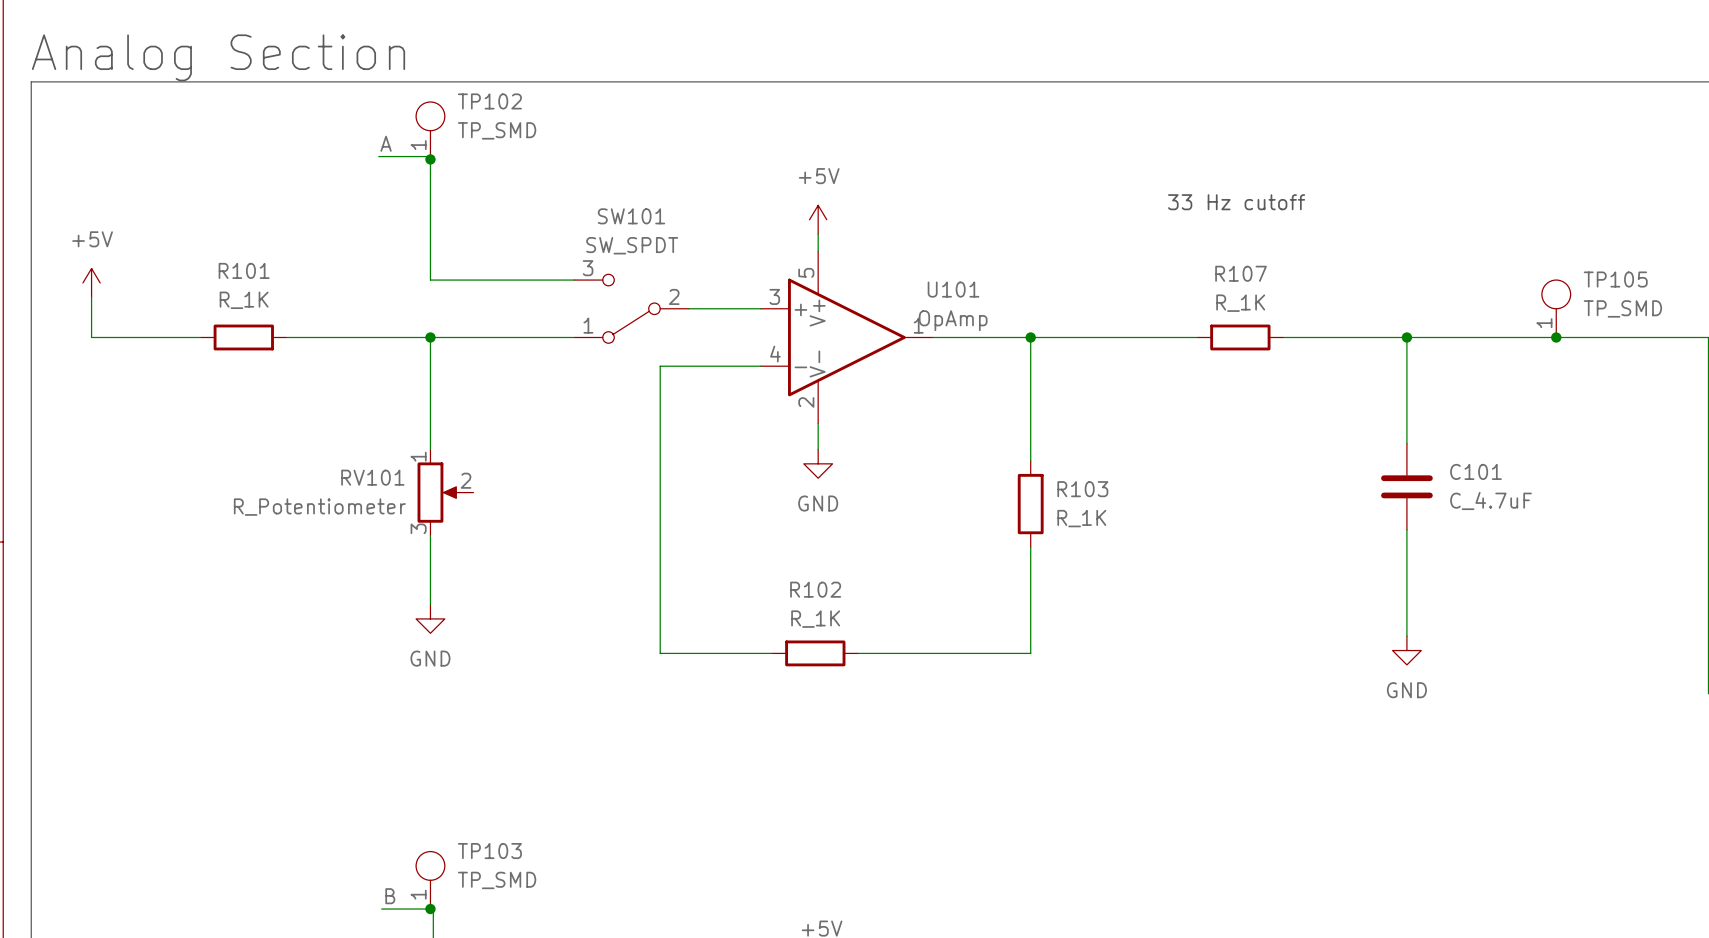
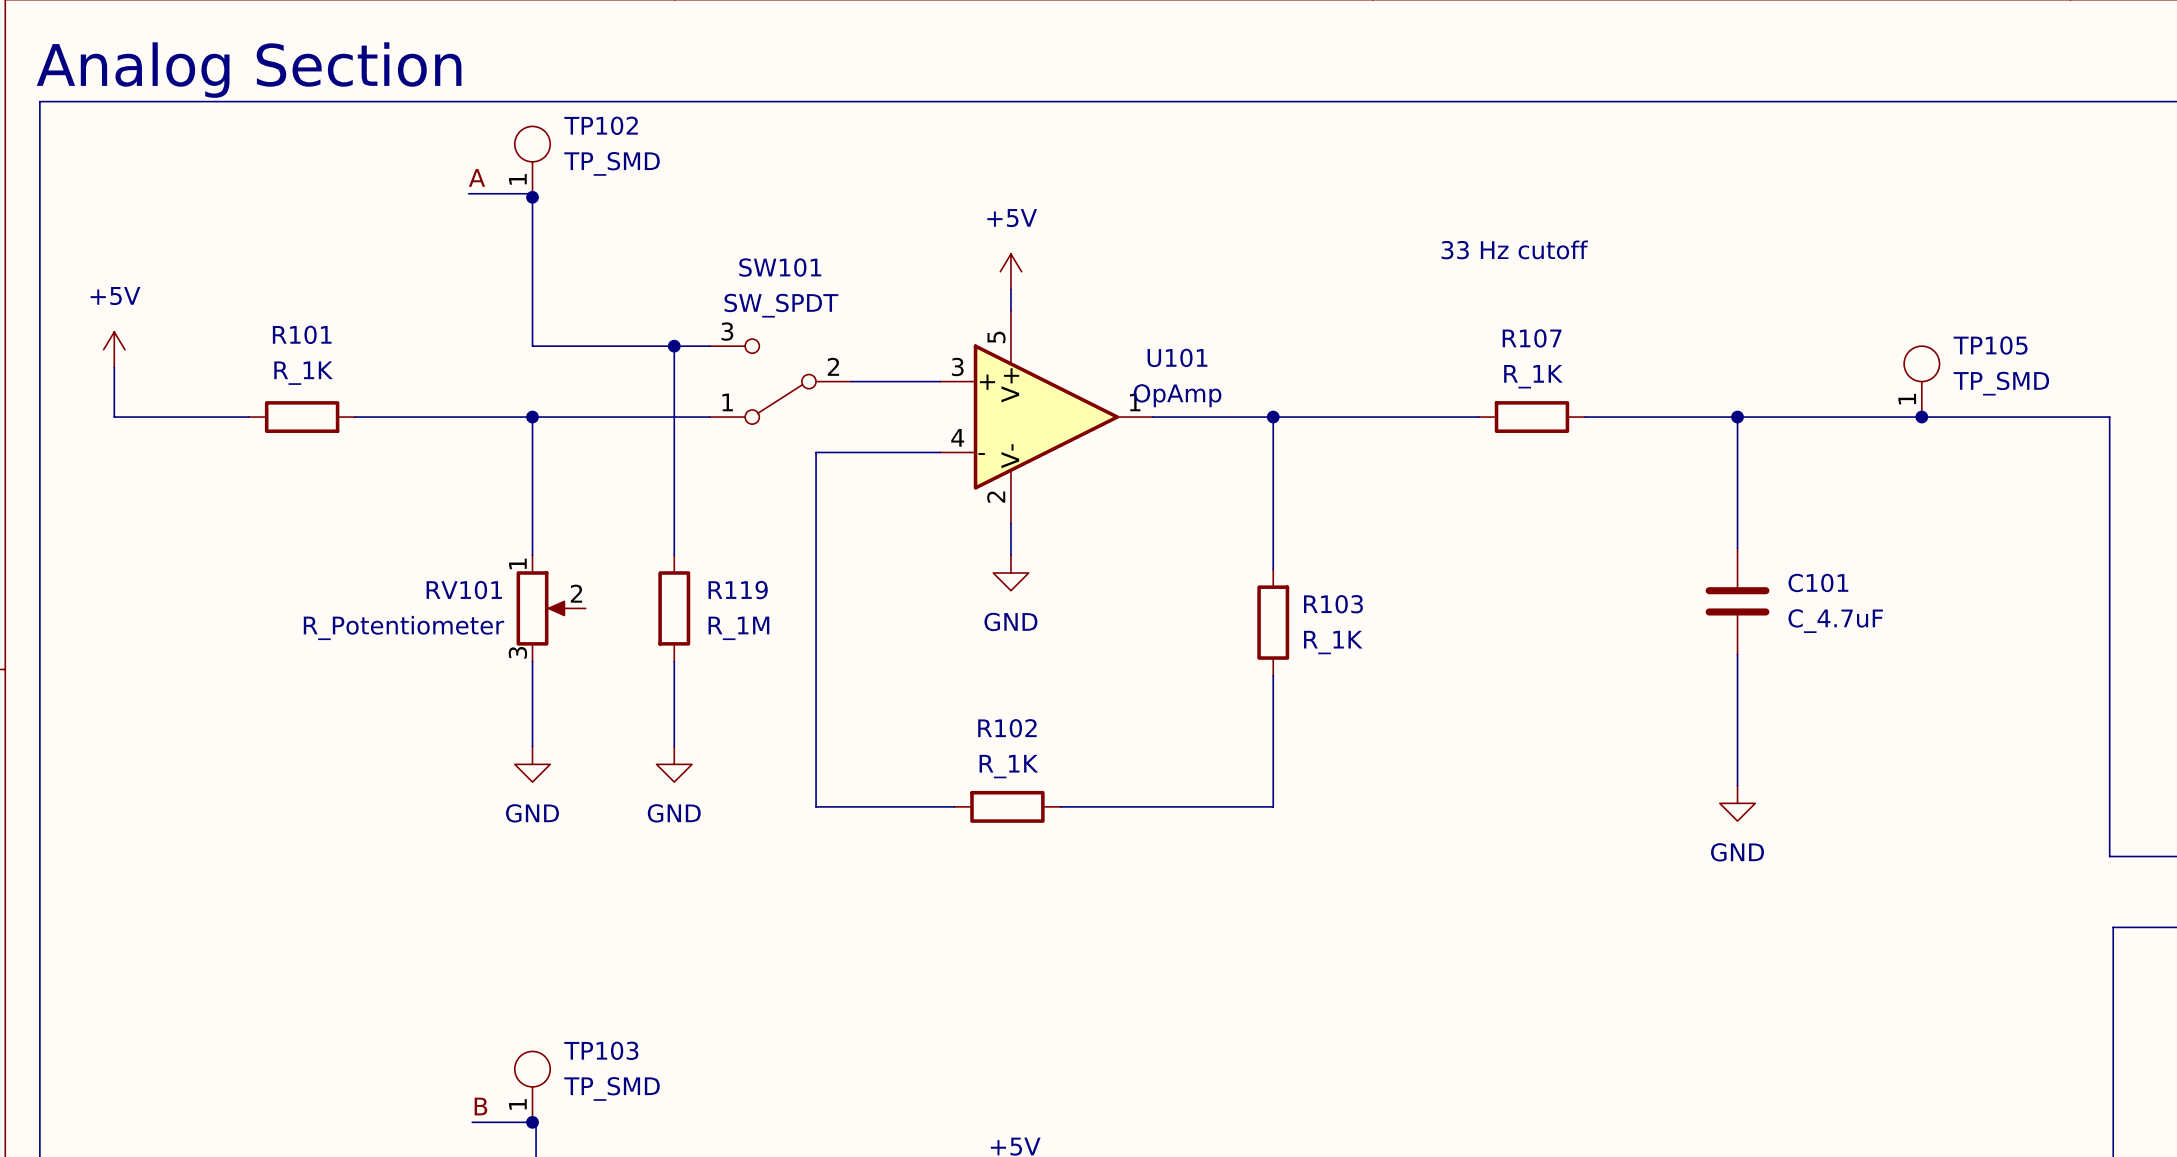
wire: none -> (674, 346) (674, 555)
junction: none -> (674, 346)
R119: none -> R_1M (674, 608)
wire: none -> (674, 661) (674, 746)
power symbol: none -> GND (674, 764)

